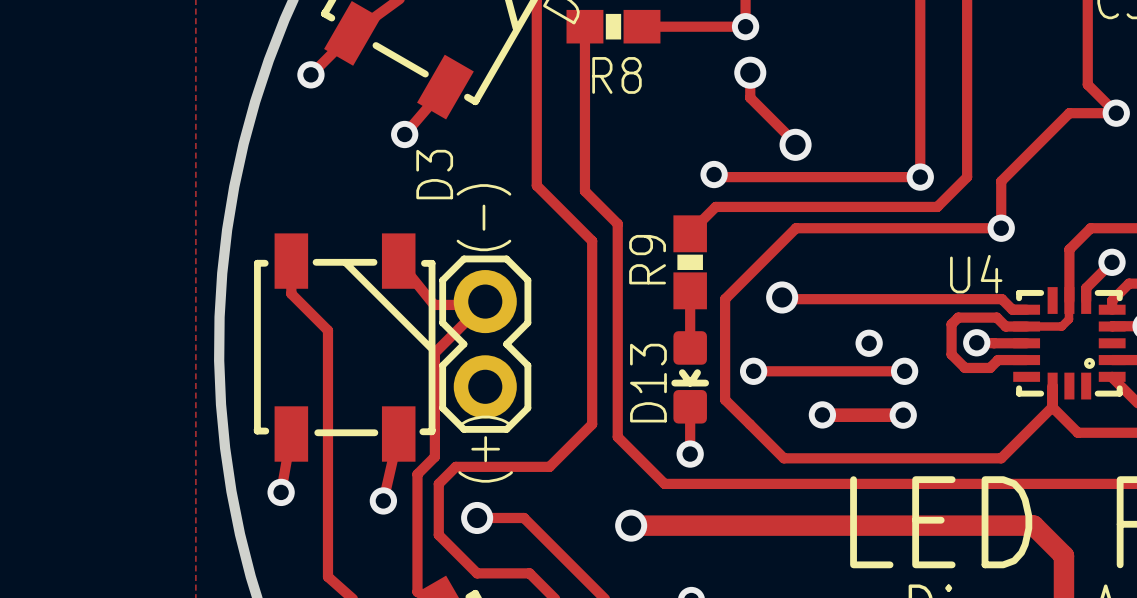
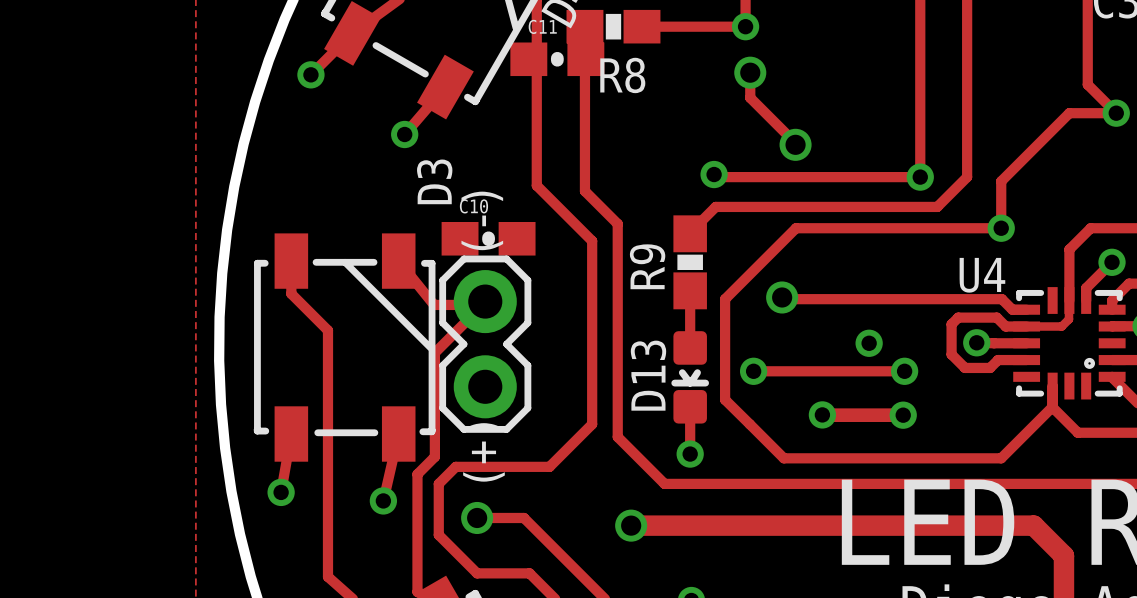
C11: none -> (557, 59)
C10: none -> (488, 238)

